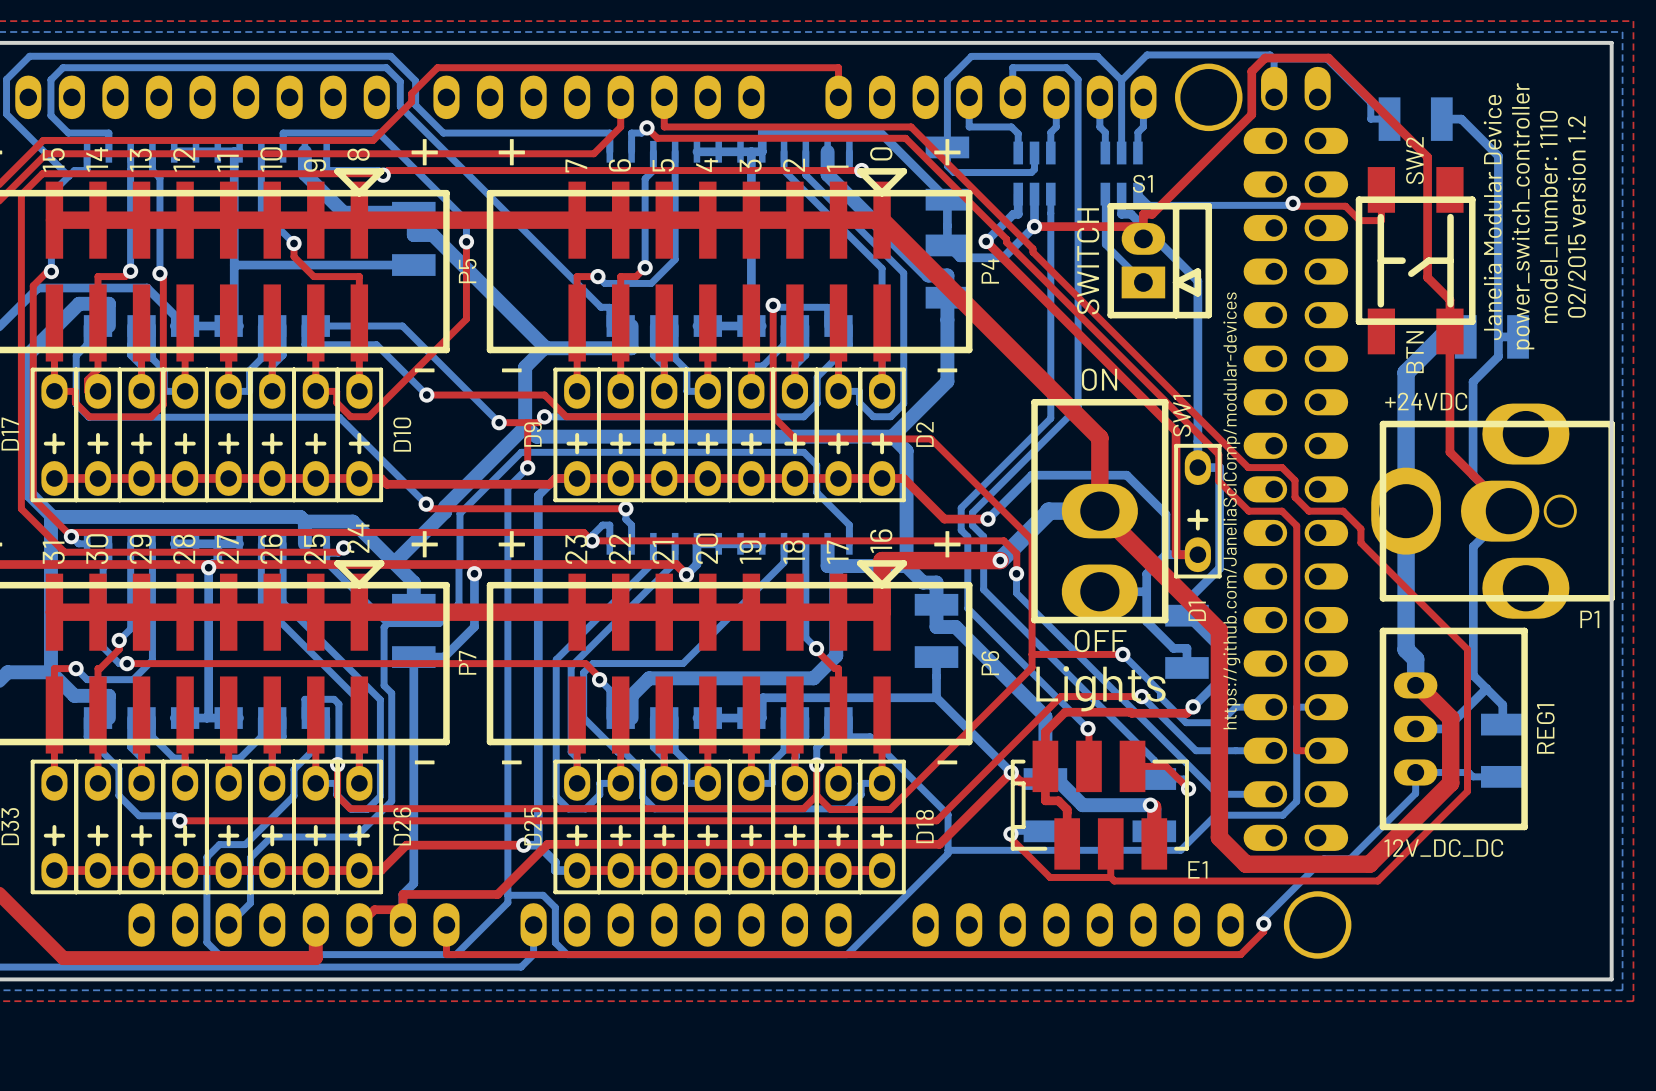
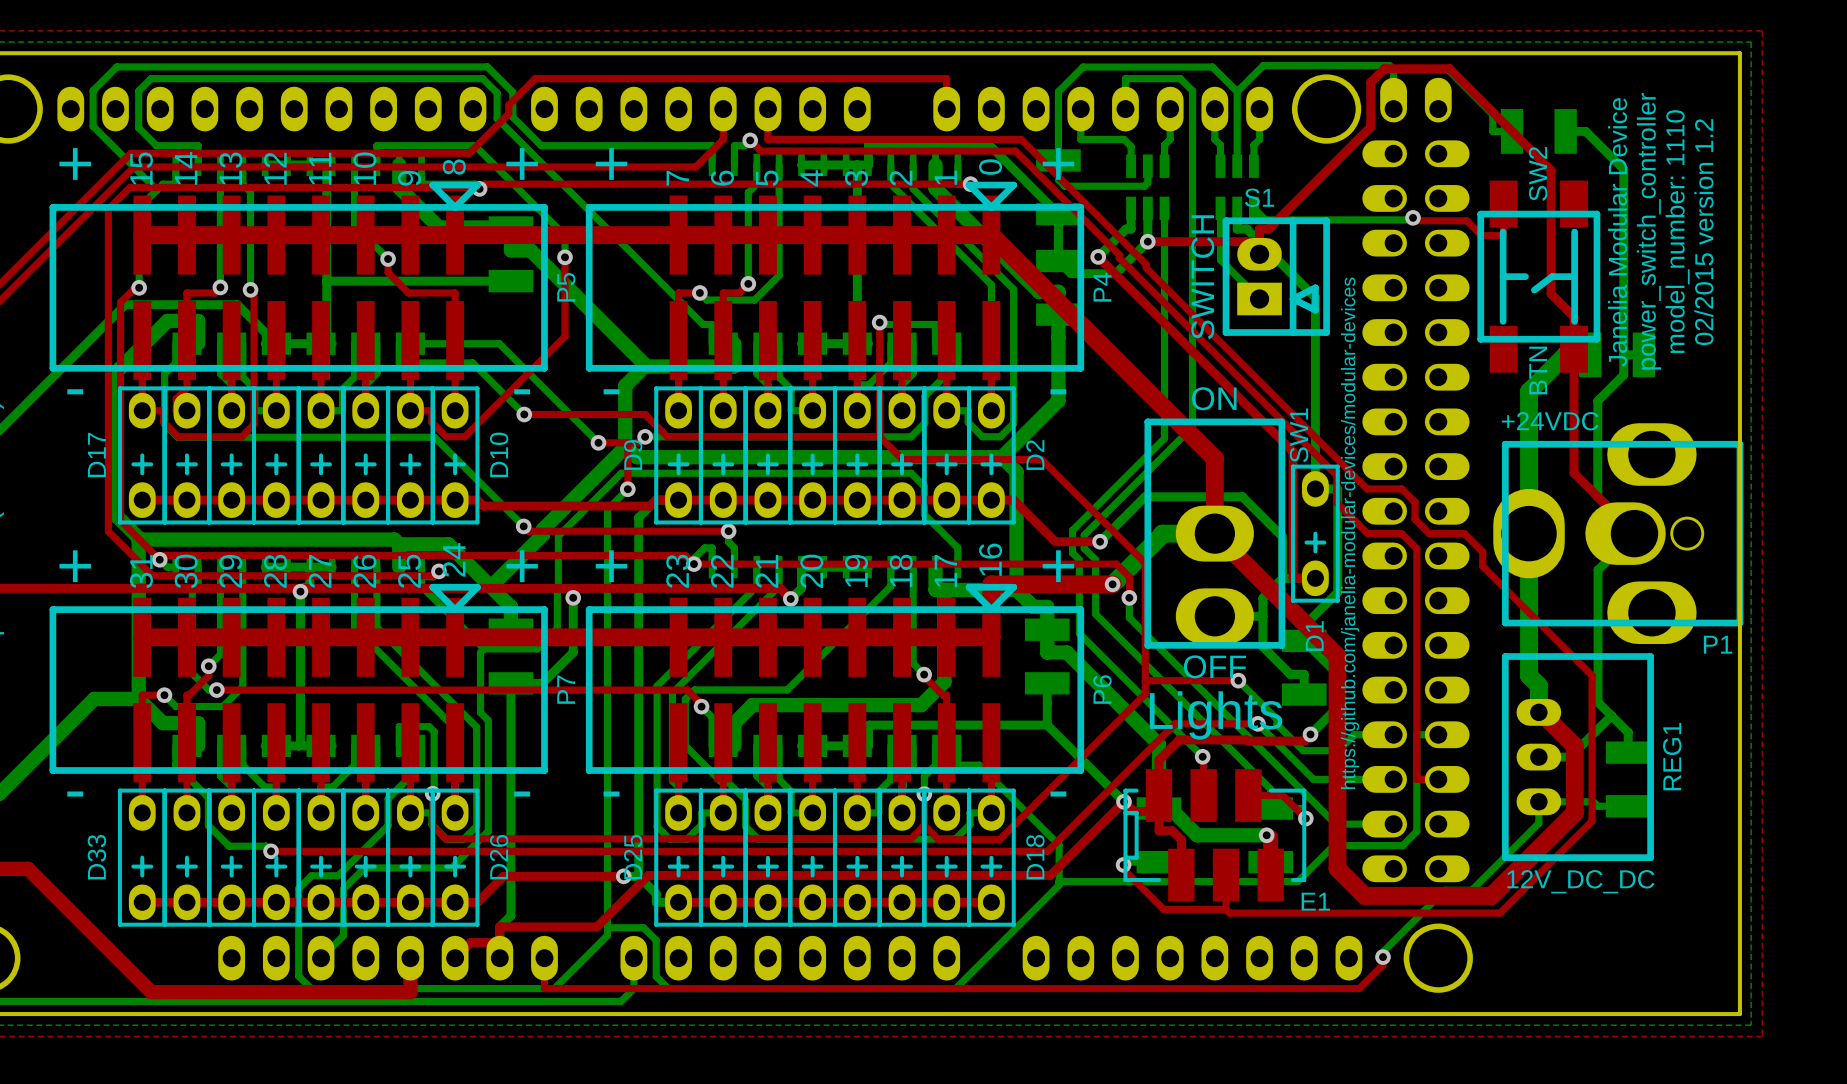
text: https://github.com/JaneliaSciComp/modular-devices (1231, 510) -> https://github.com/janelia-modular-devices/modular-devices (1350, 533)

